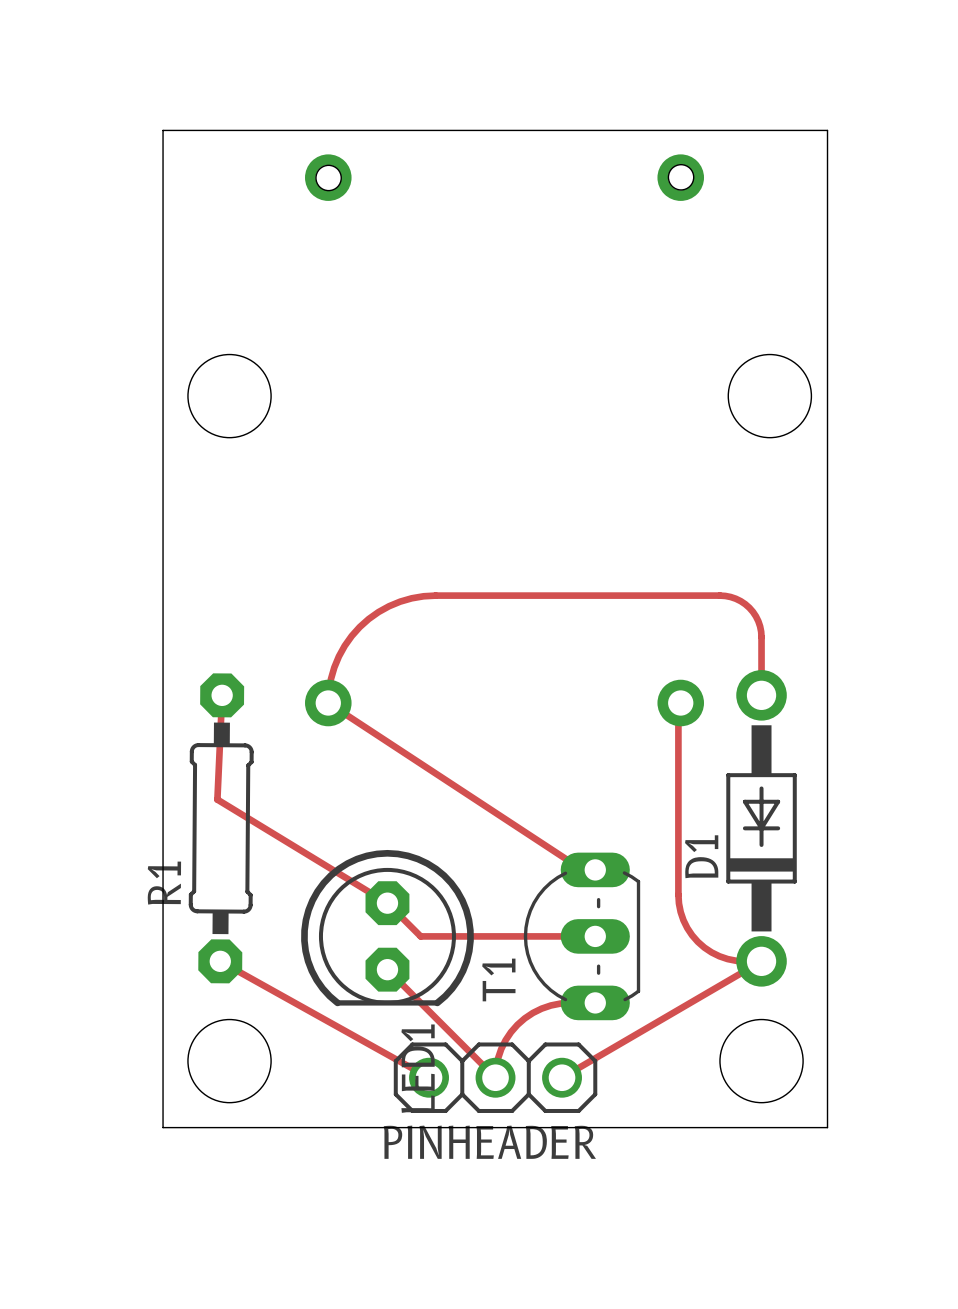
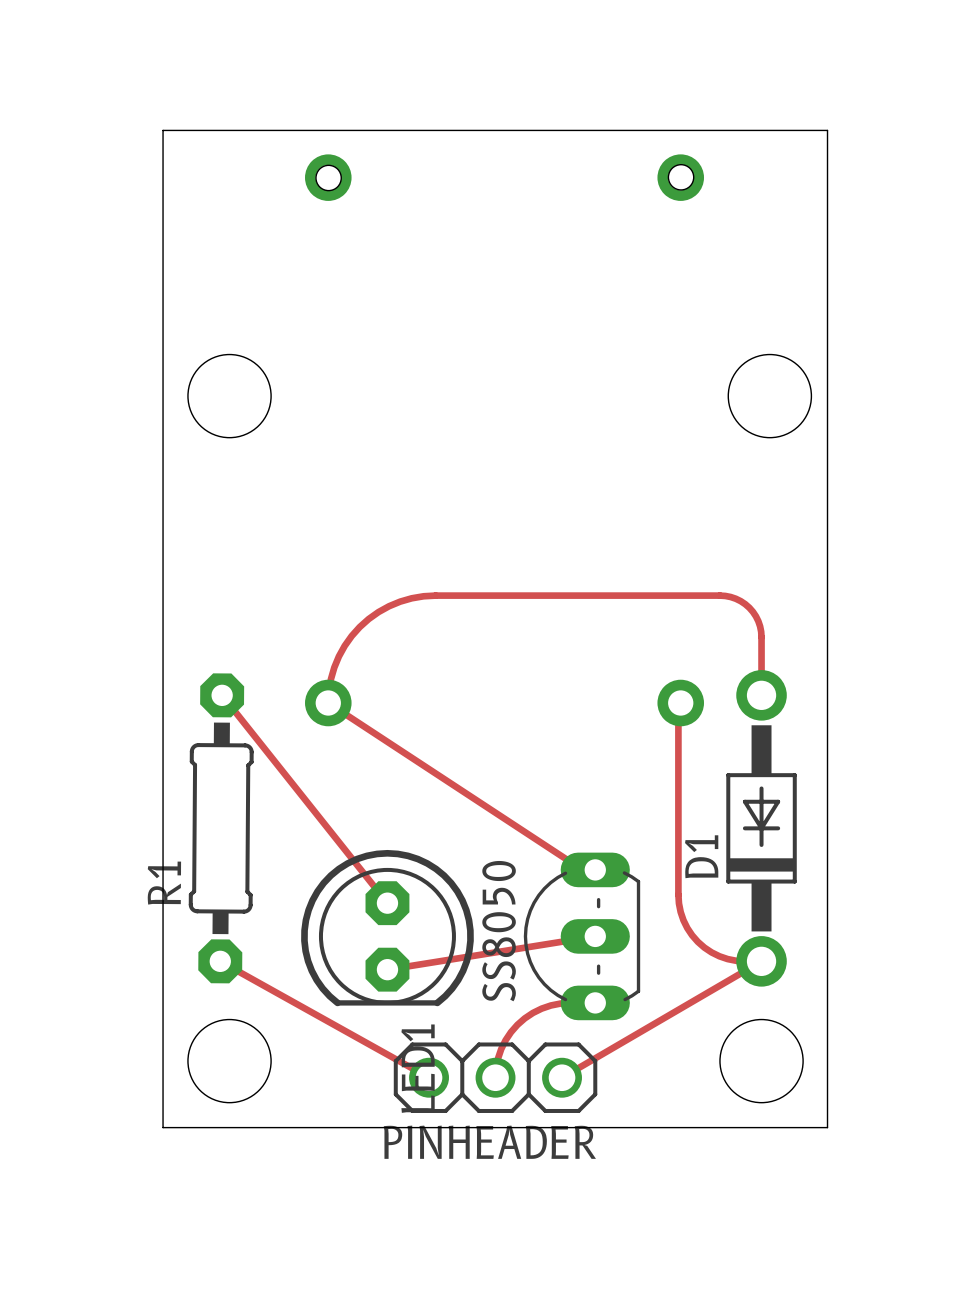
top track: (222, 695) (217, 799) (387, 903) (420, 936) (595, 936) -> (222, 695) (387, 903)
top track: (387, 969) (495, 1077) -> (387, 969) (595, 936)
T1 name: T1 (498, 979) -> SS8050 (499, 931)

